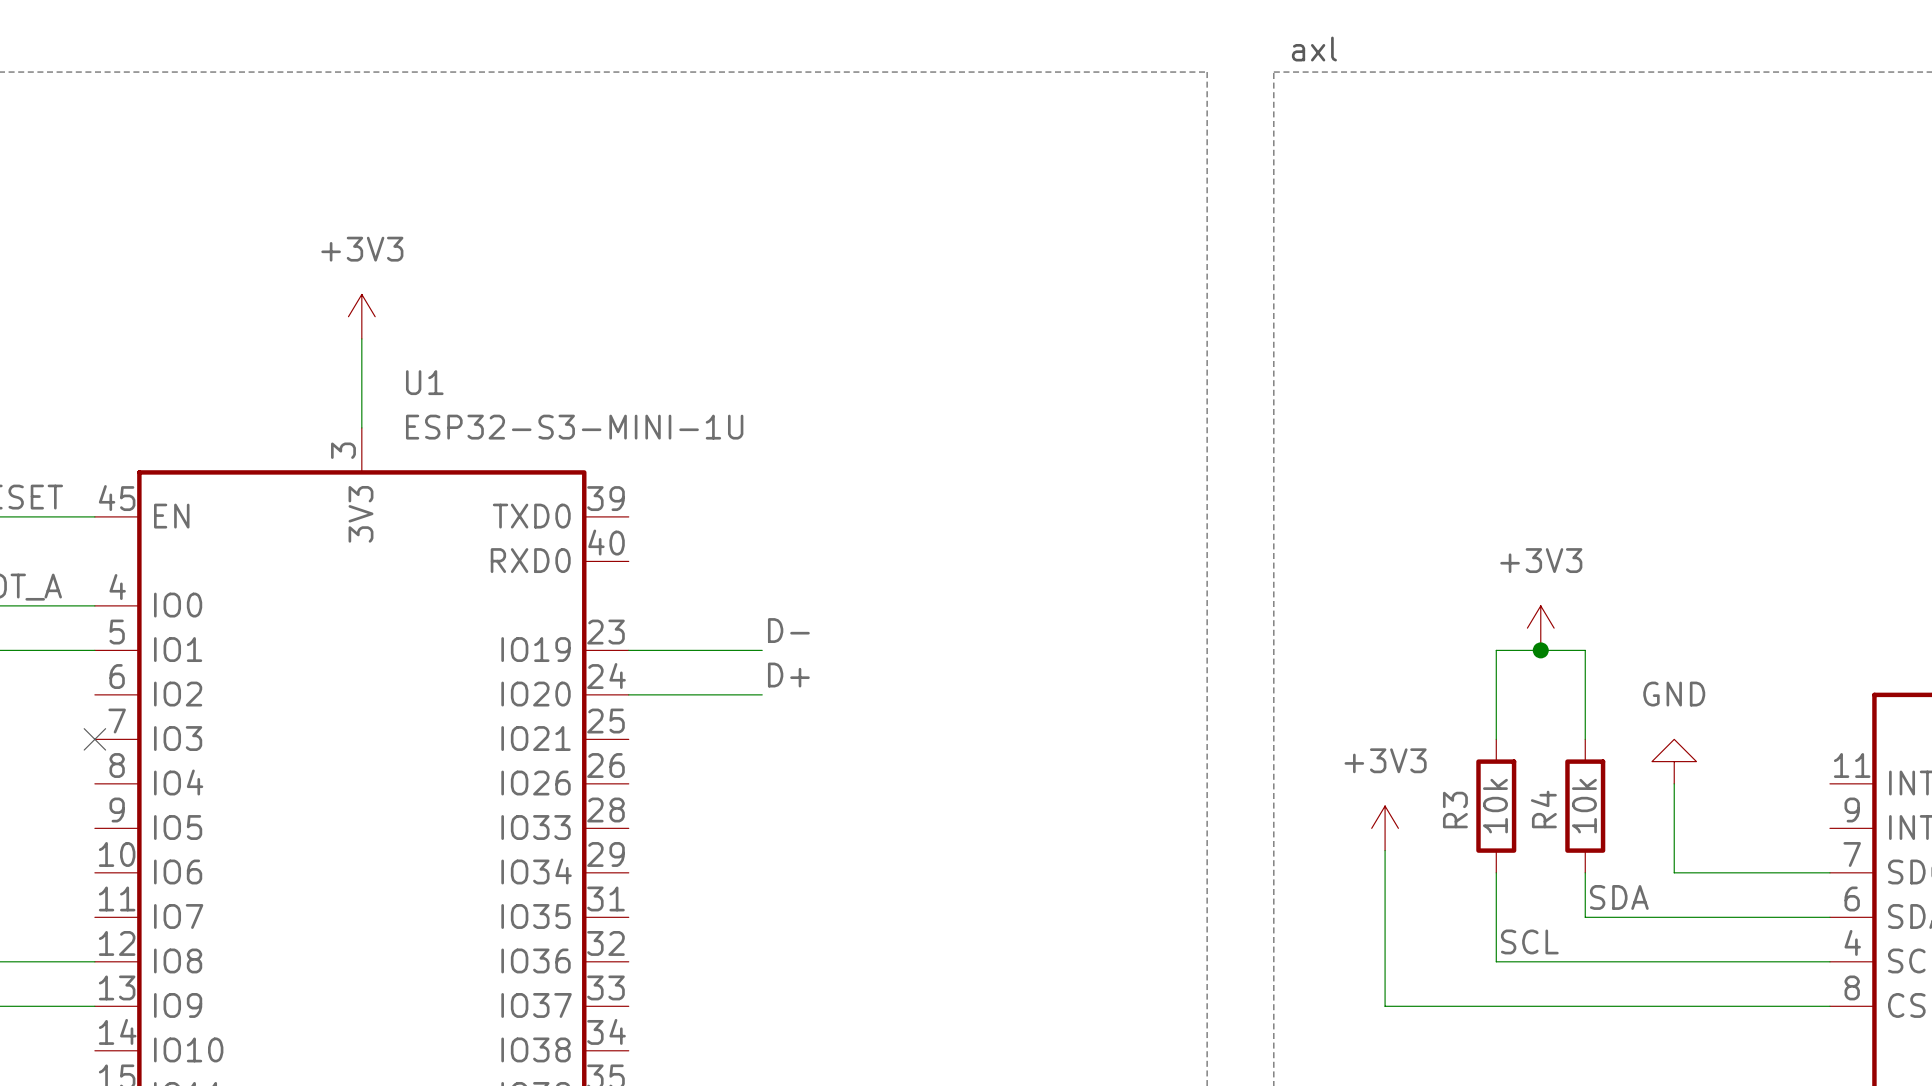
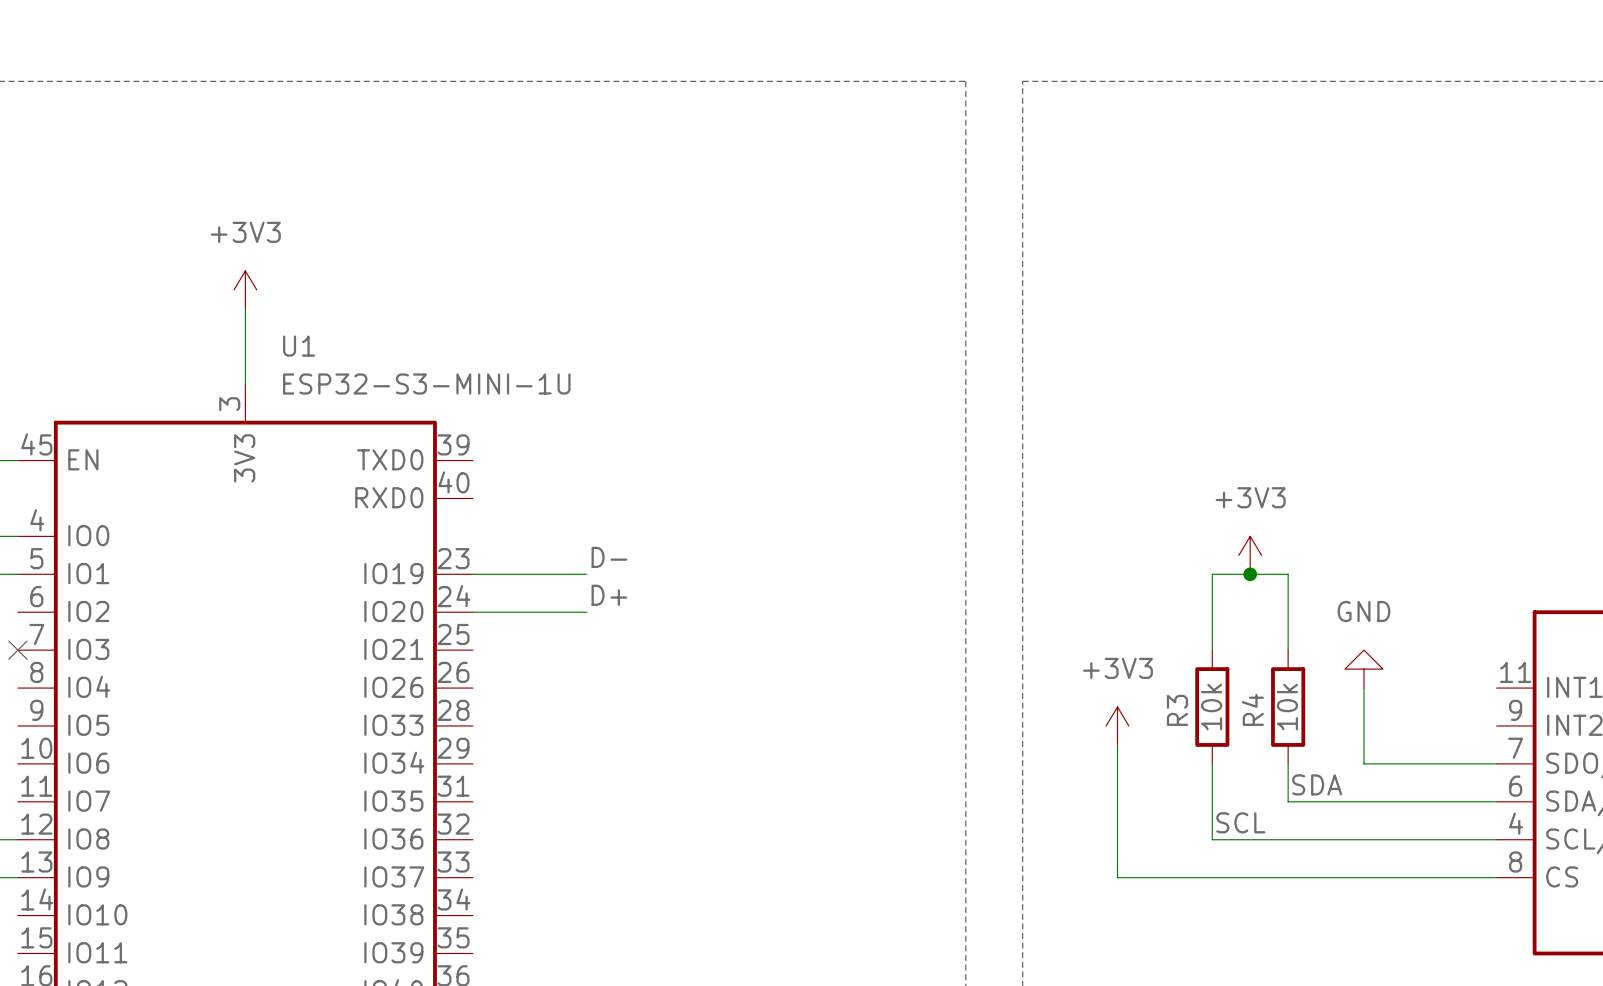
text: axl (1314, 49) -> none

